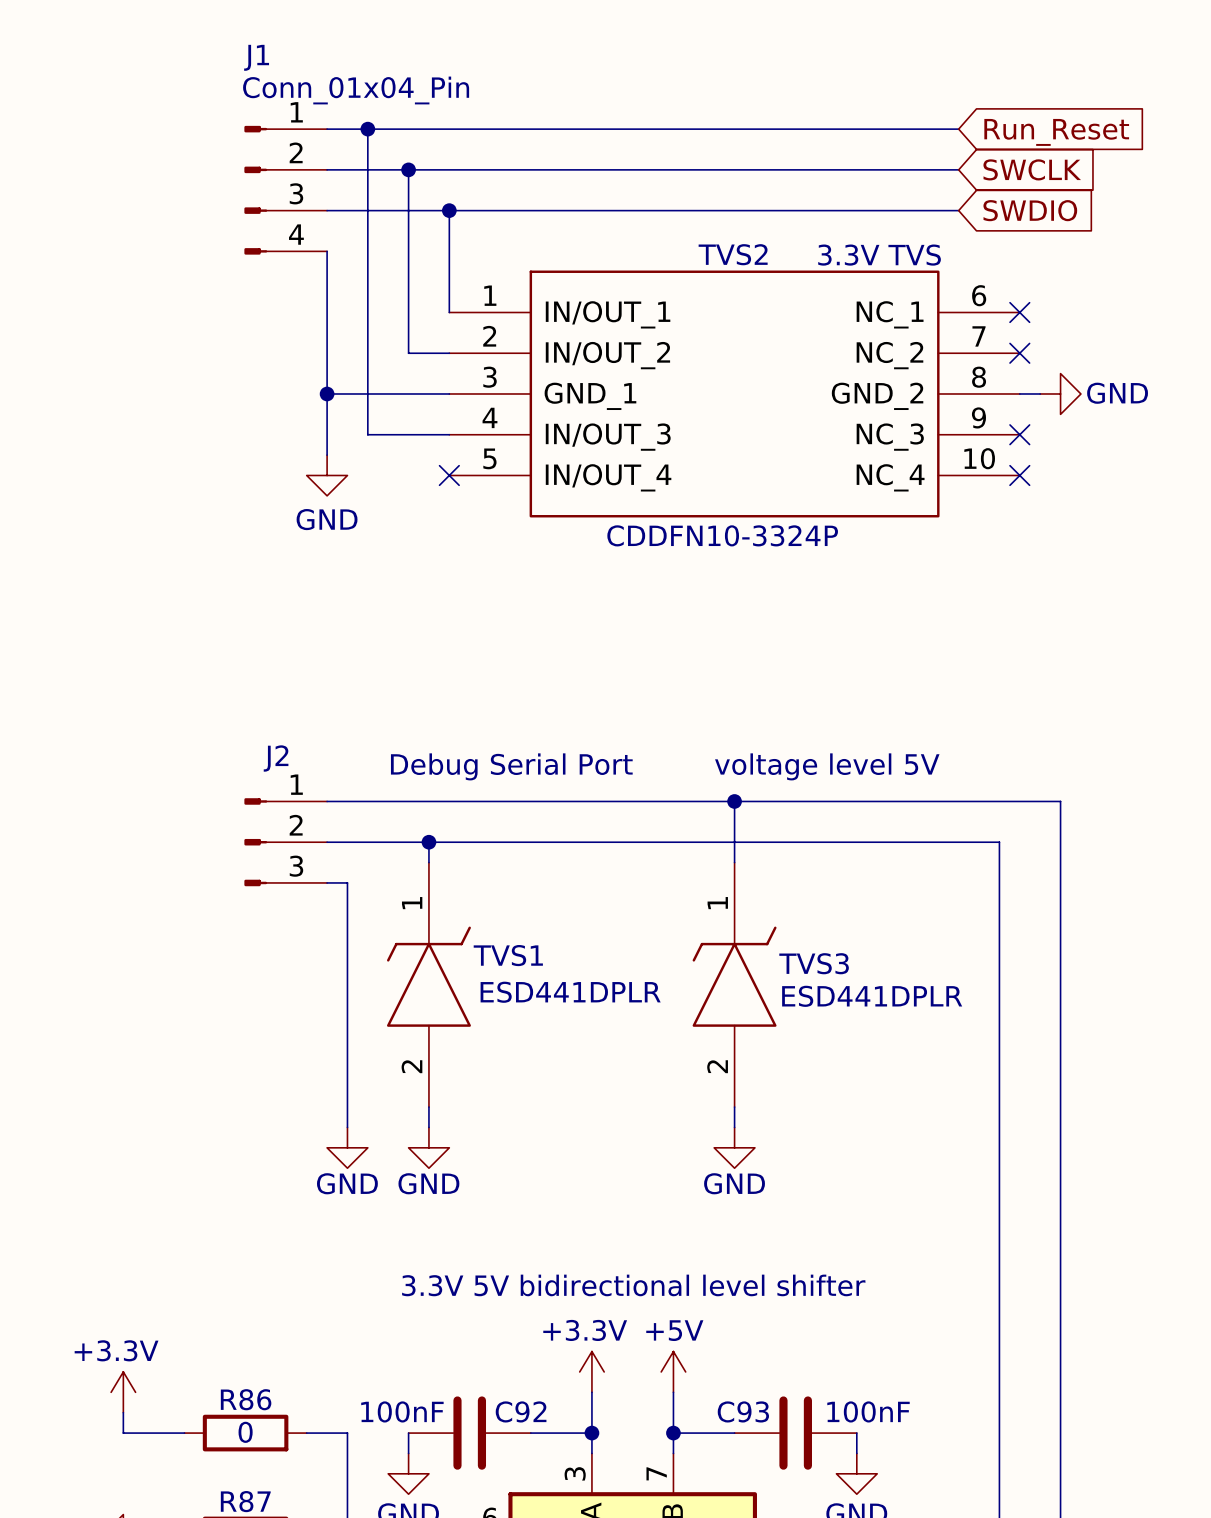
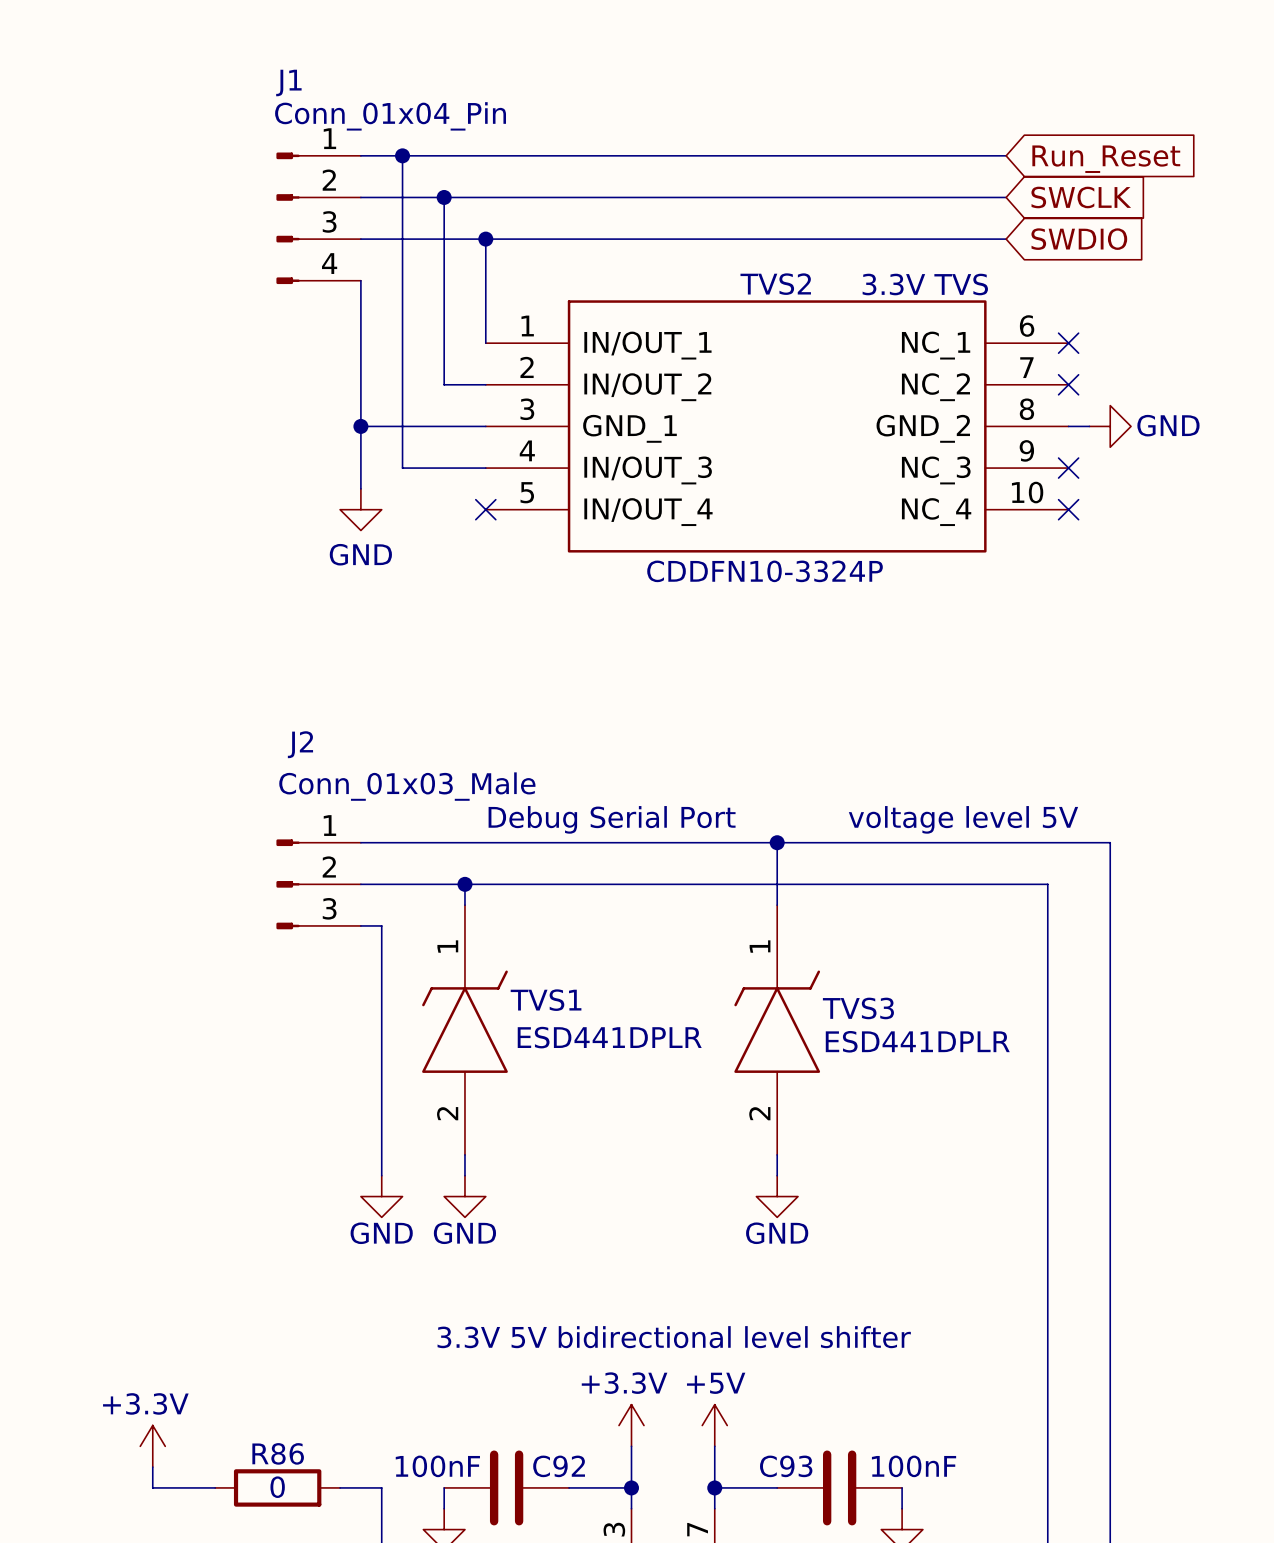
J2 value: none -> Conn_01x03_Male (407, 786)
J2 name position: J2 (276, 758) -> J2 (300, 744)
text position: Debug Serial Port (511, 766) -> Debug Serial Port (612, 819)
text position: voltage level 5V (827, 766) -> voltage level 5V (963, 819)

